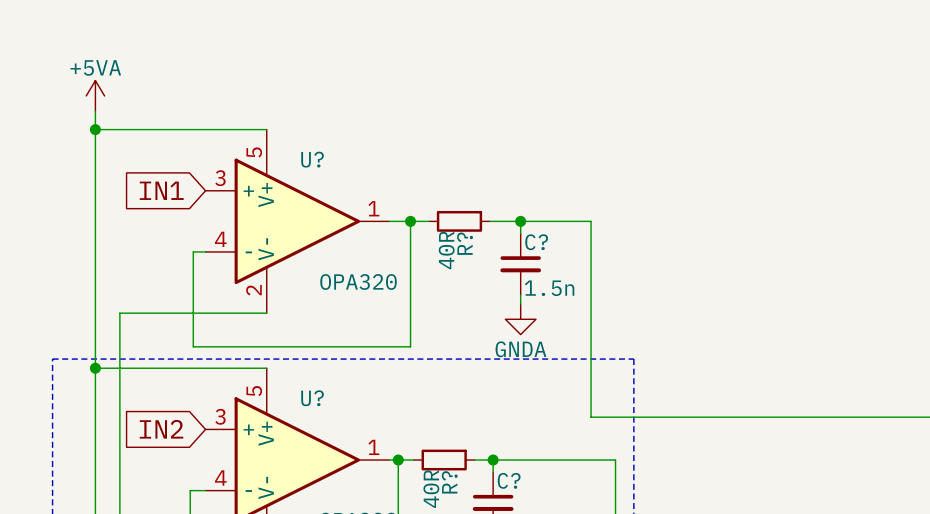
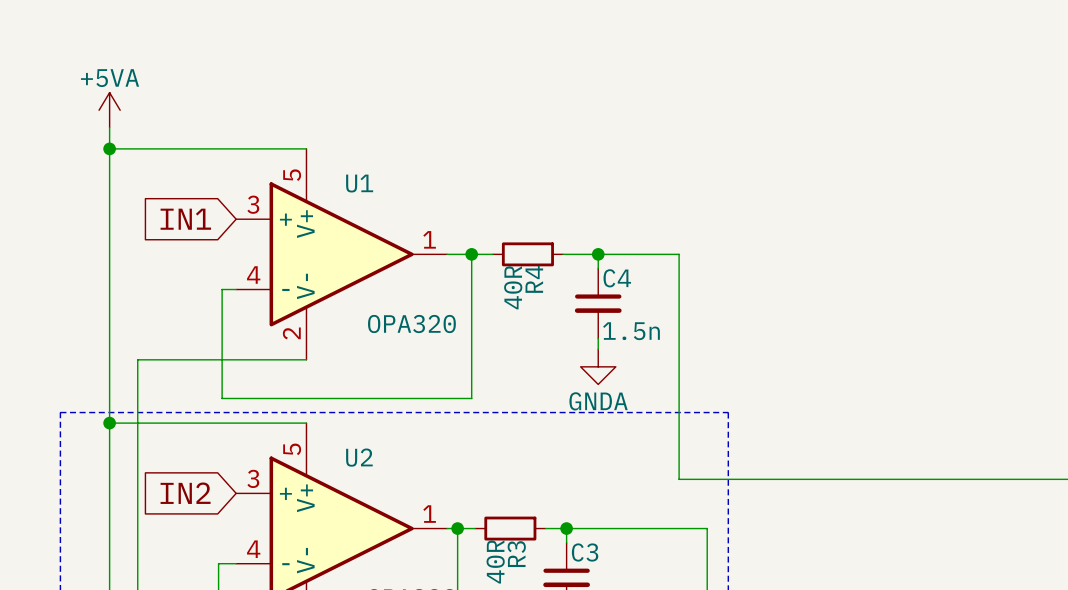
U? name: U? (312, 159) -> U1 (359, 183)
C? name: C? (536, 242) -> C4 (617, 278)
R? name: R? (465, 243) -> R4 (534, 279)
U? name: U? (312, 398) -> U2 (359, 457)
C? name: C? (509, 480) -> C3 (585, 552)
R? name: R? (449, 482) -> R3 (516, 554)

